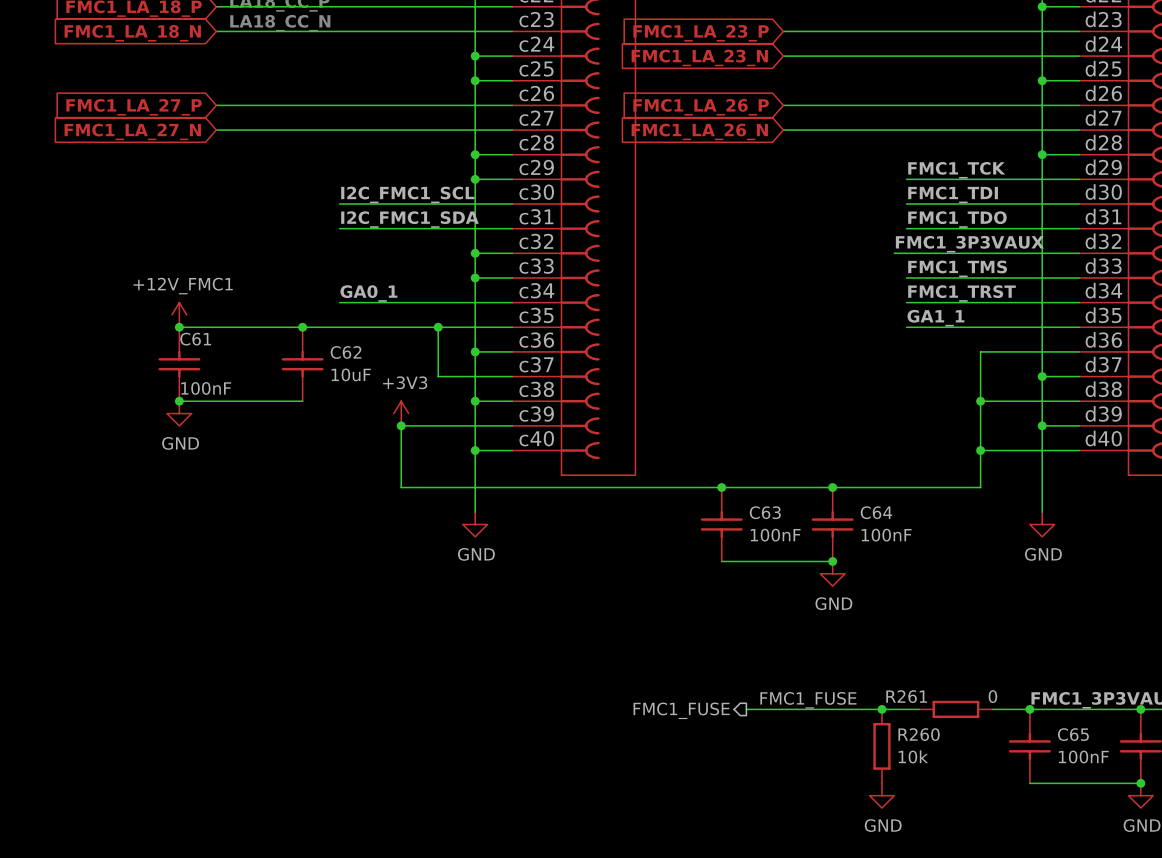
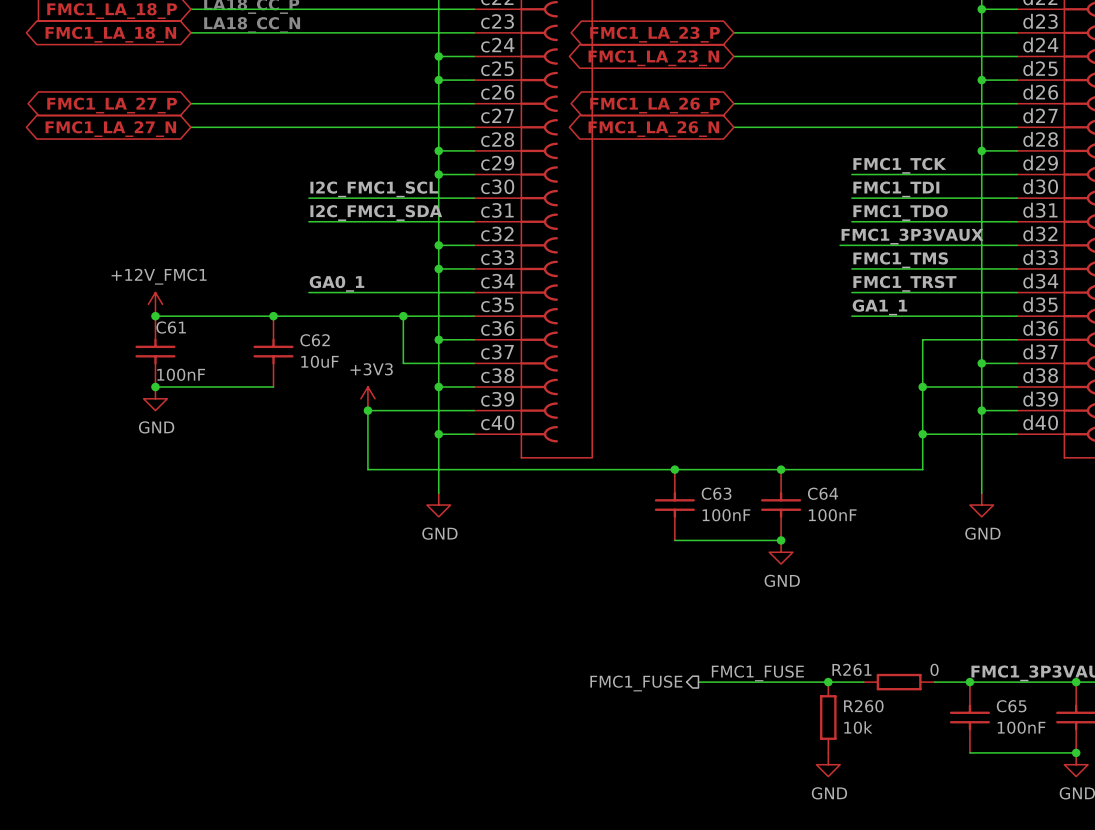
global label shape: input (132, 33) -> bidirectional (110, 34)
global label shape: input (701, 33) -> bidirectional (655, 34)
global label shape: input (699, 57) -> bidirectional (653, 58)
global label shape: input (134, 107) -> bidirectional (112, 105)
global label shape: input (701, 107) -> bidirectional (655, 105)
global label shape: input (132, 131) -> bidirectional (110, 129)
global label shape: input (699, 131) -> bidirectional (653, 129)

